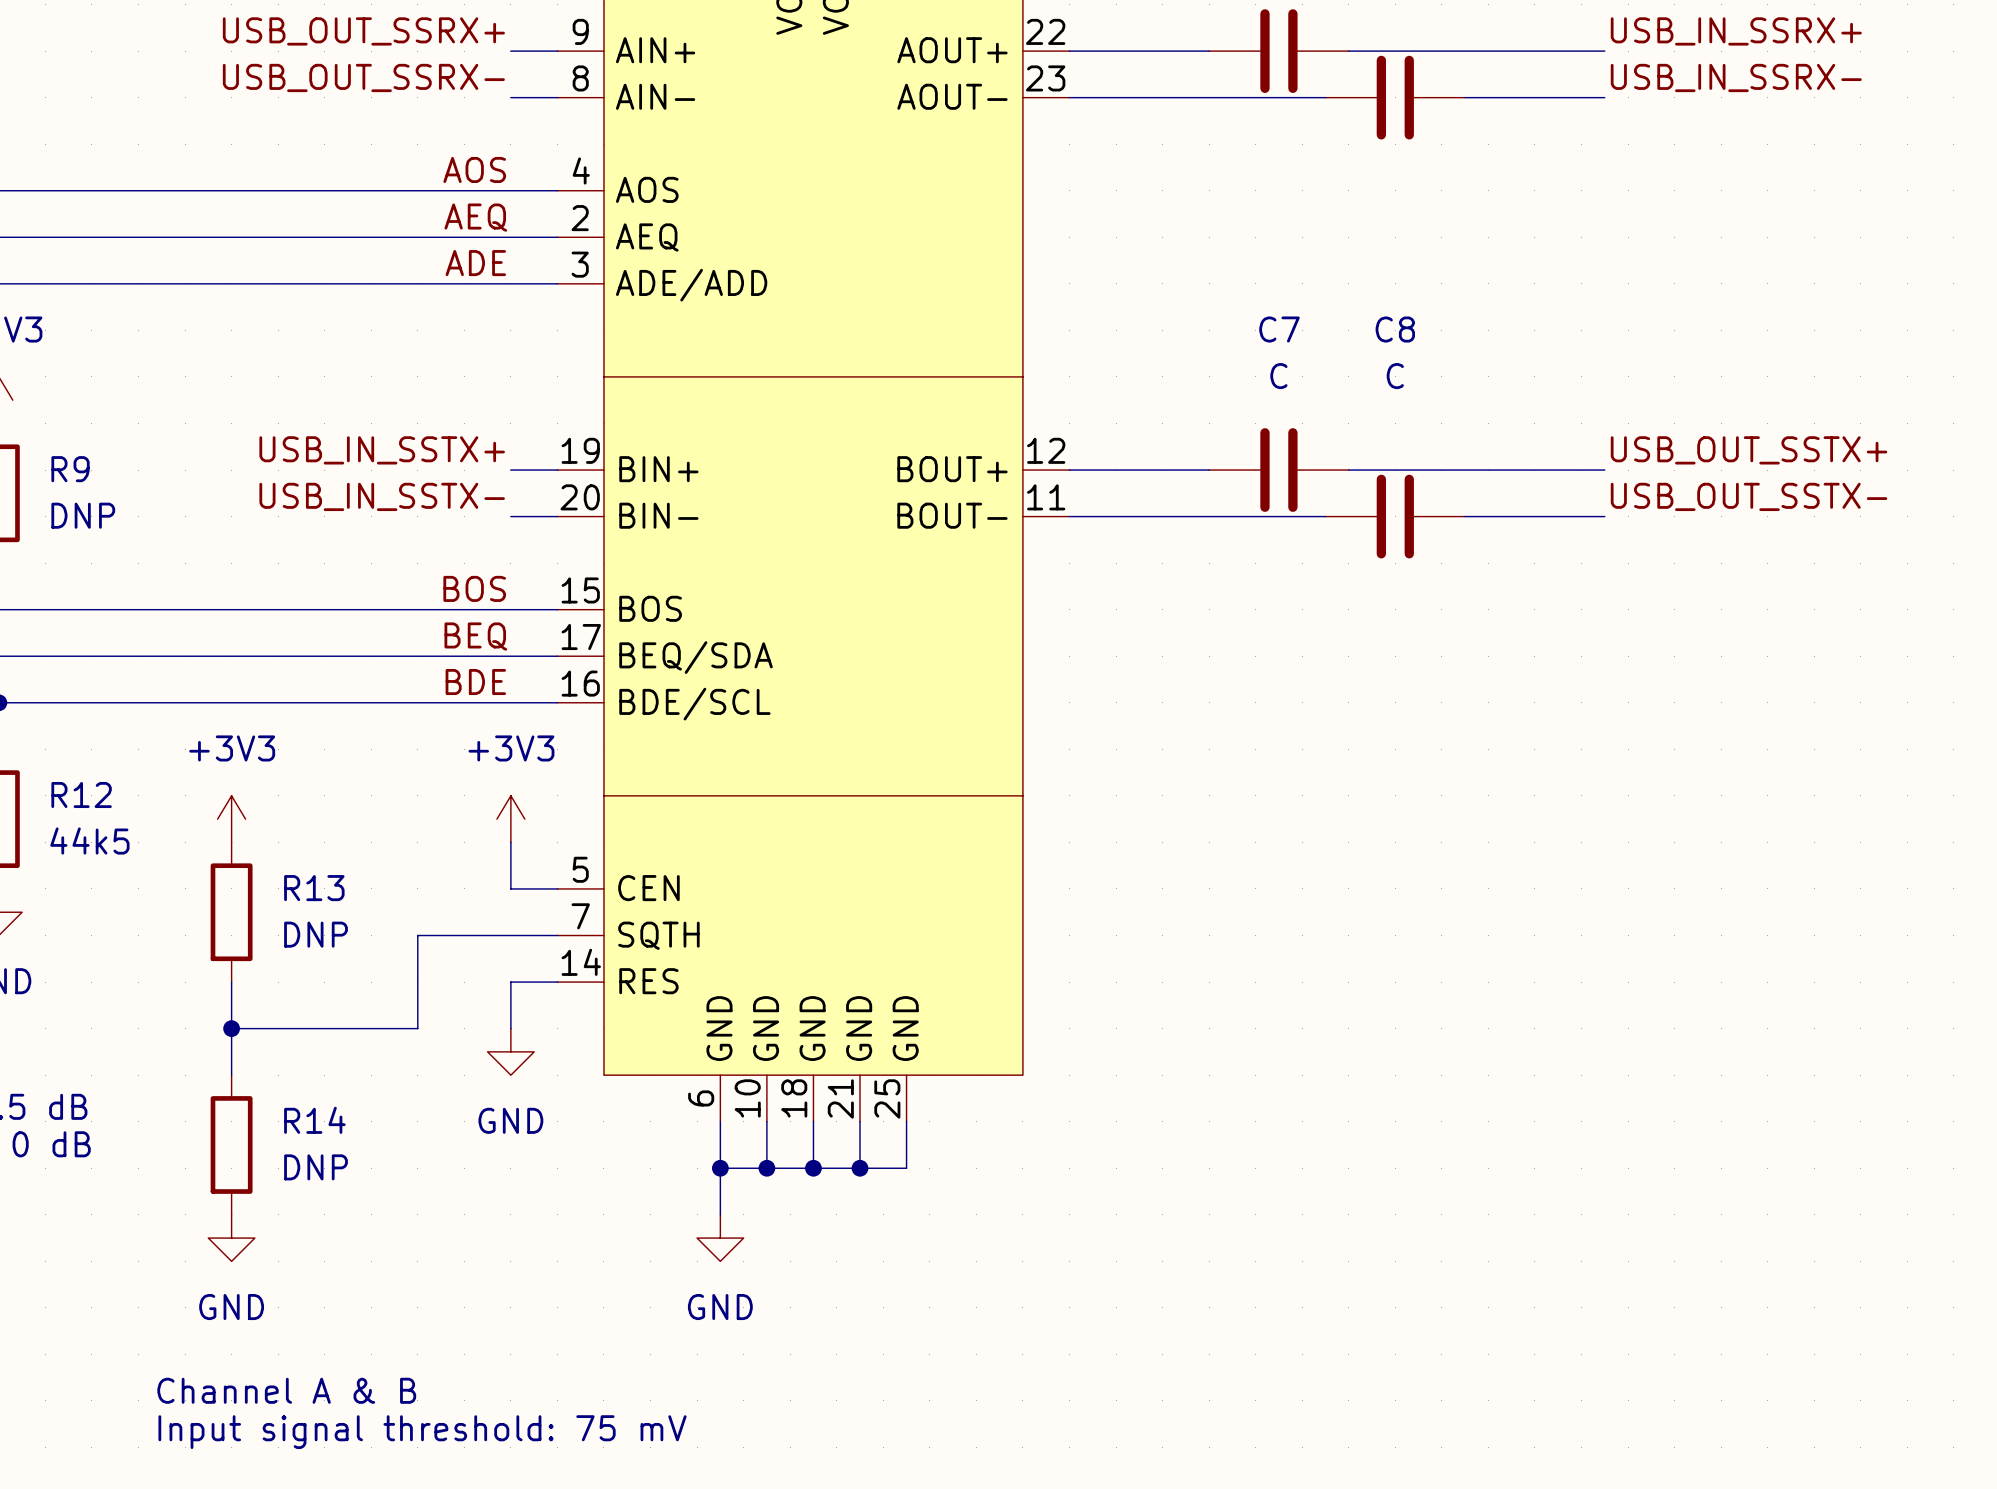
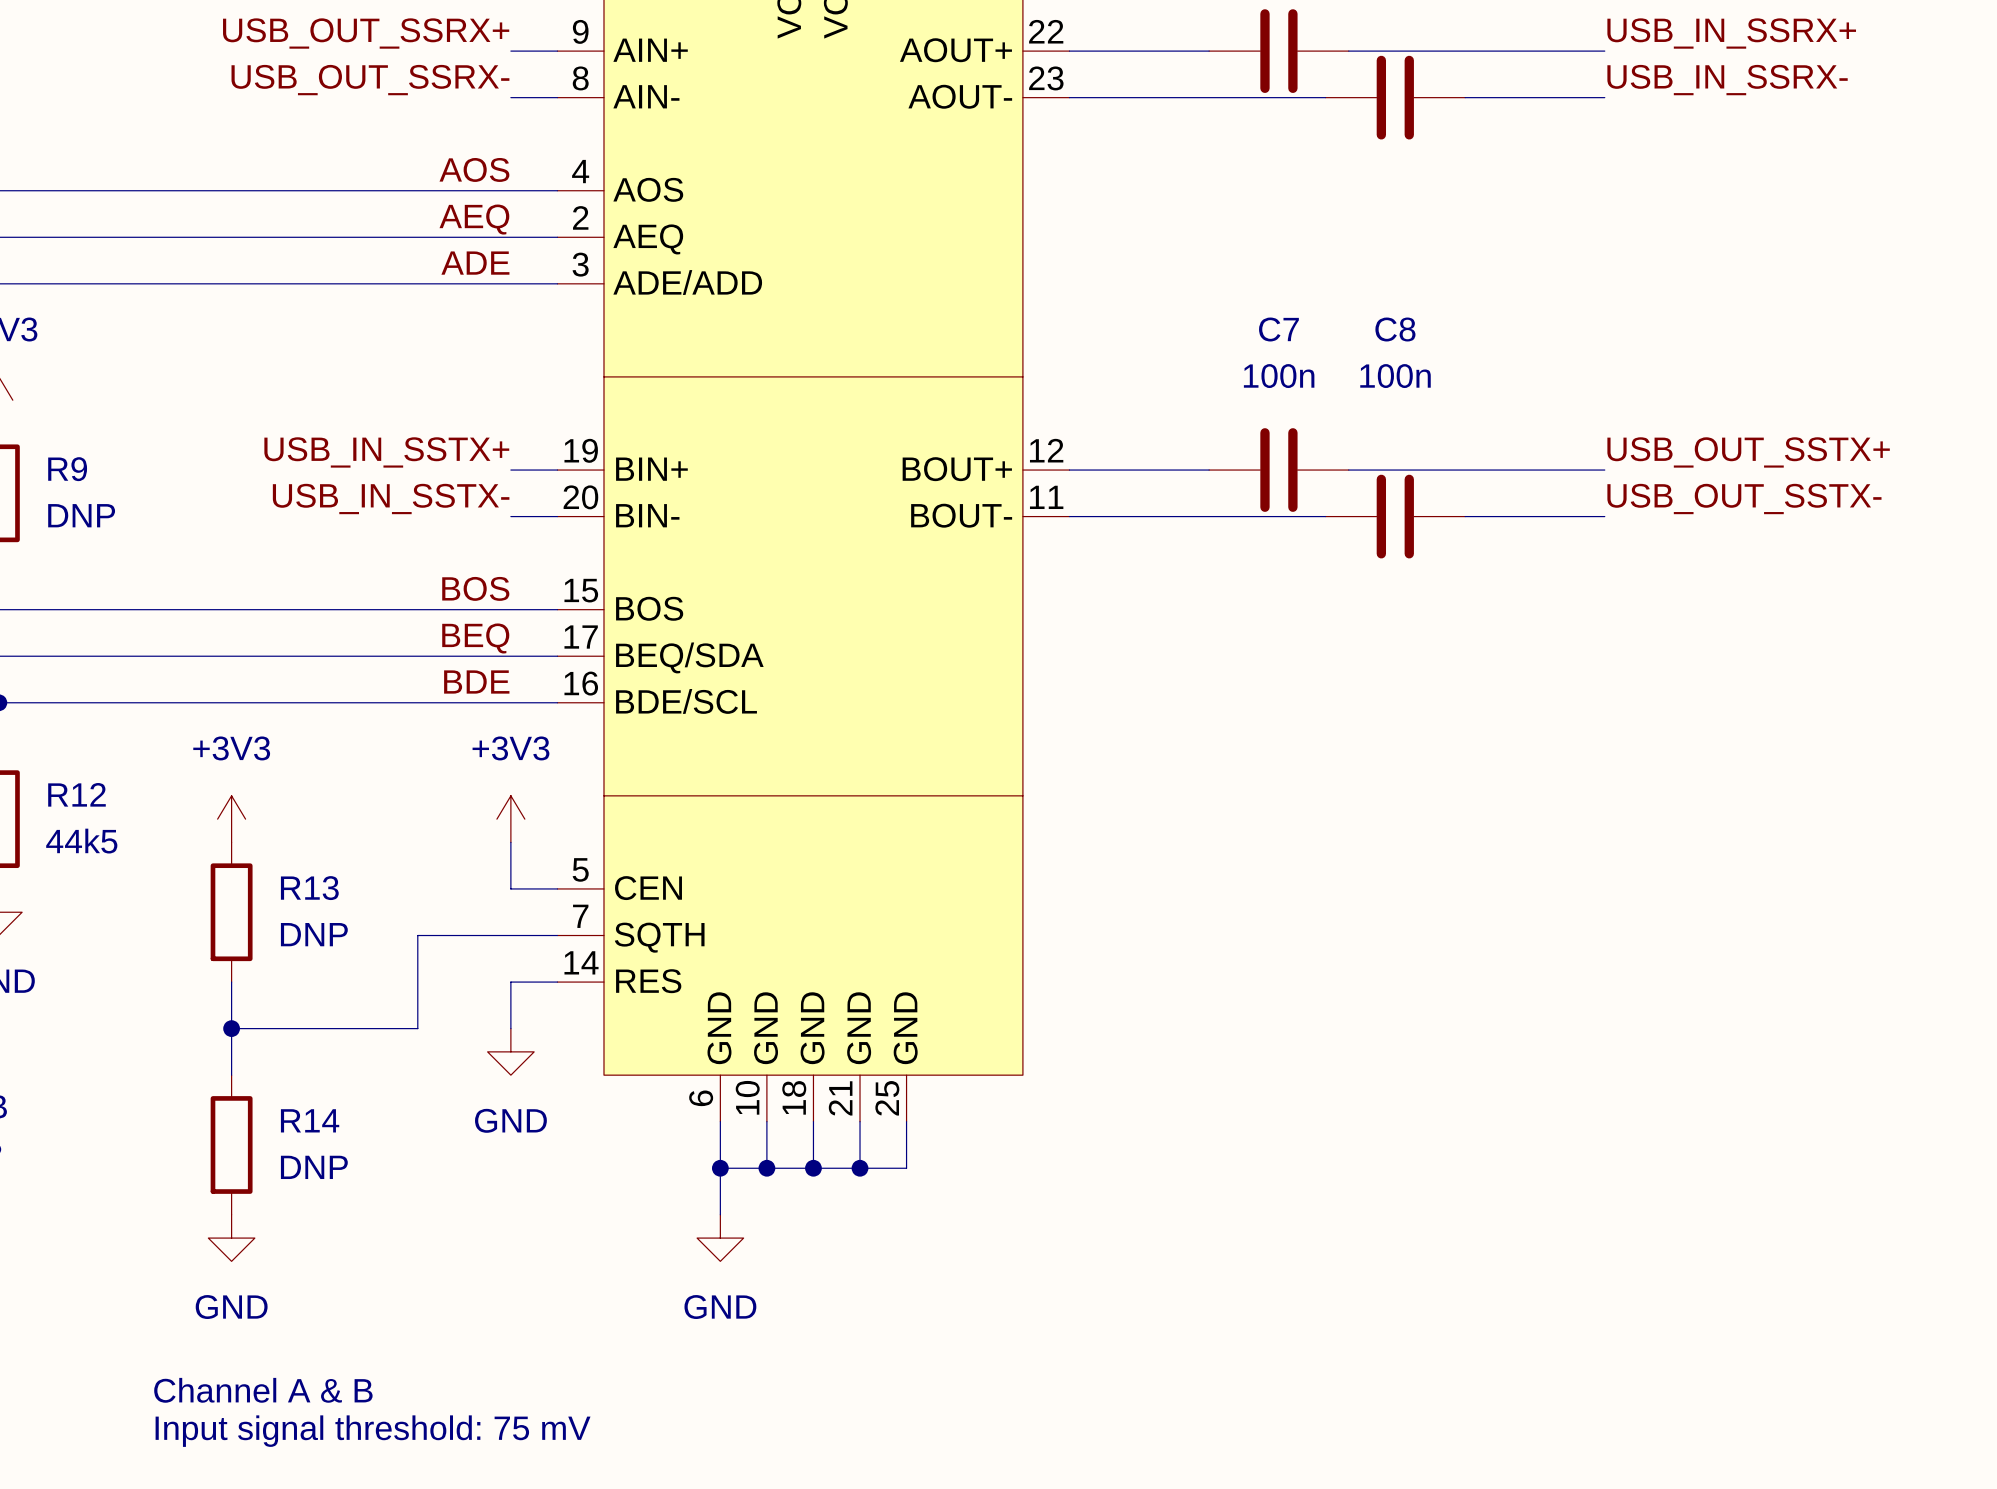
C7 value: C (1278, 376) -> 100n (1279, 376)
C8 value: C (1395, 376) -> 100n (1395, 376)

